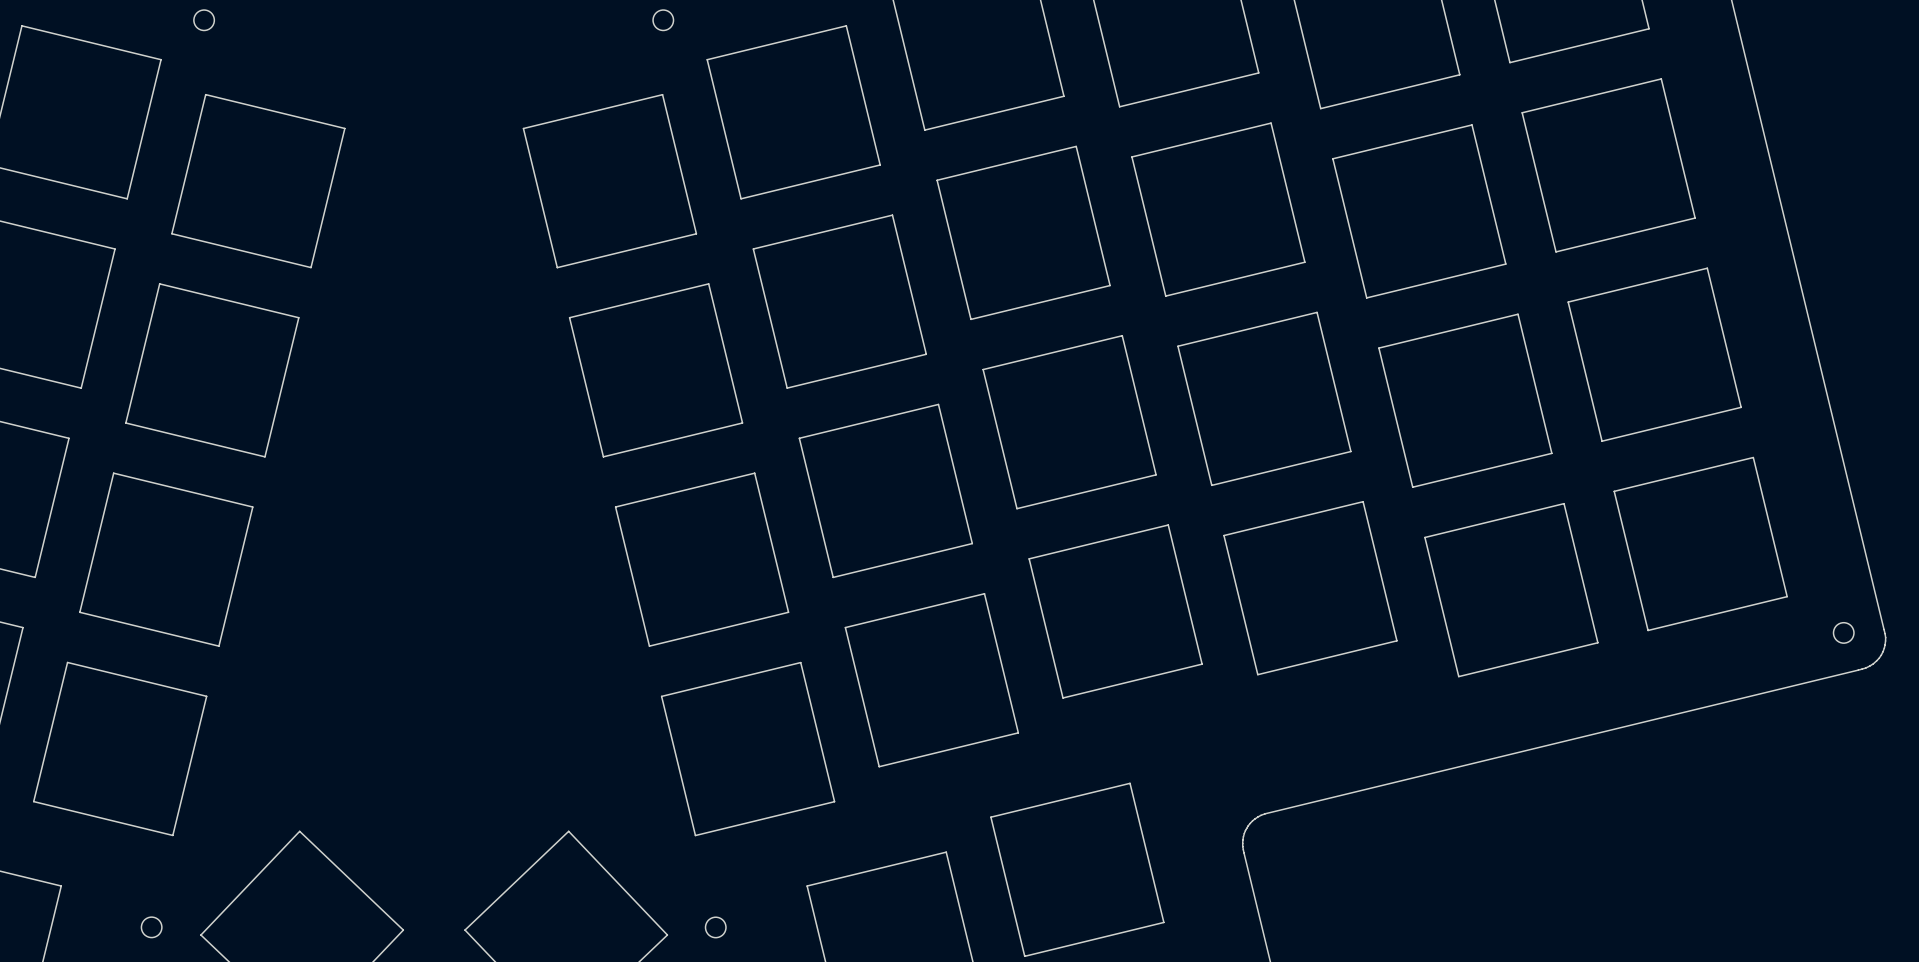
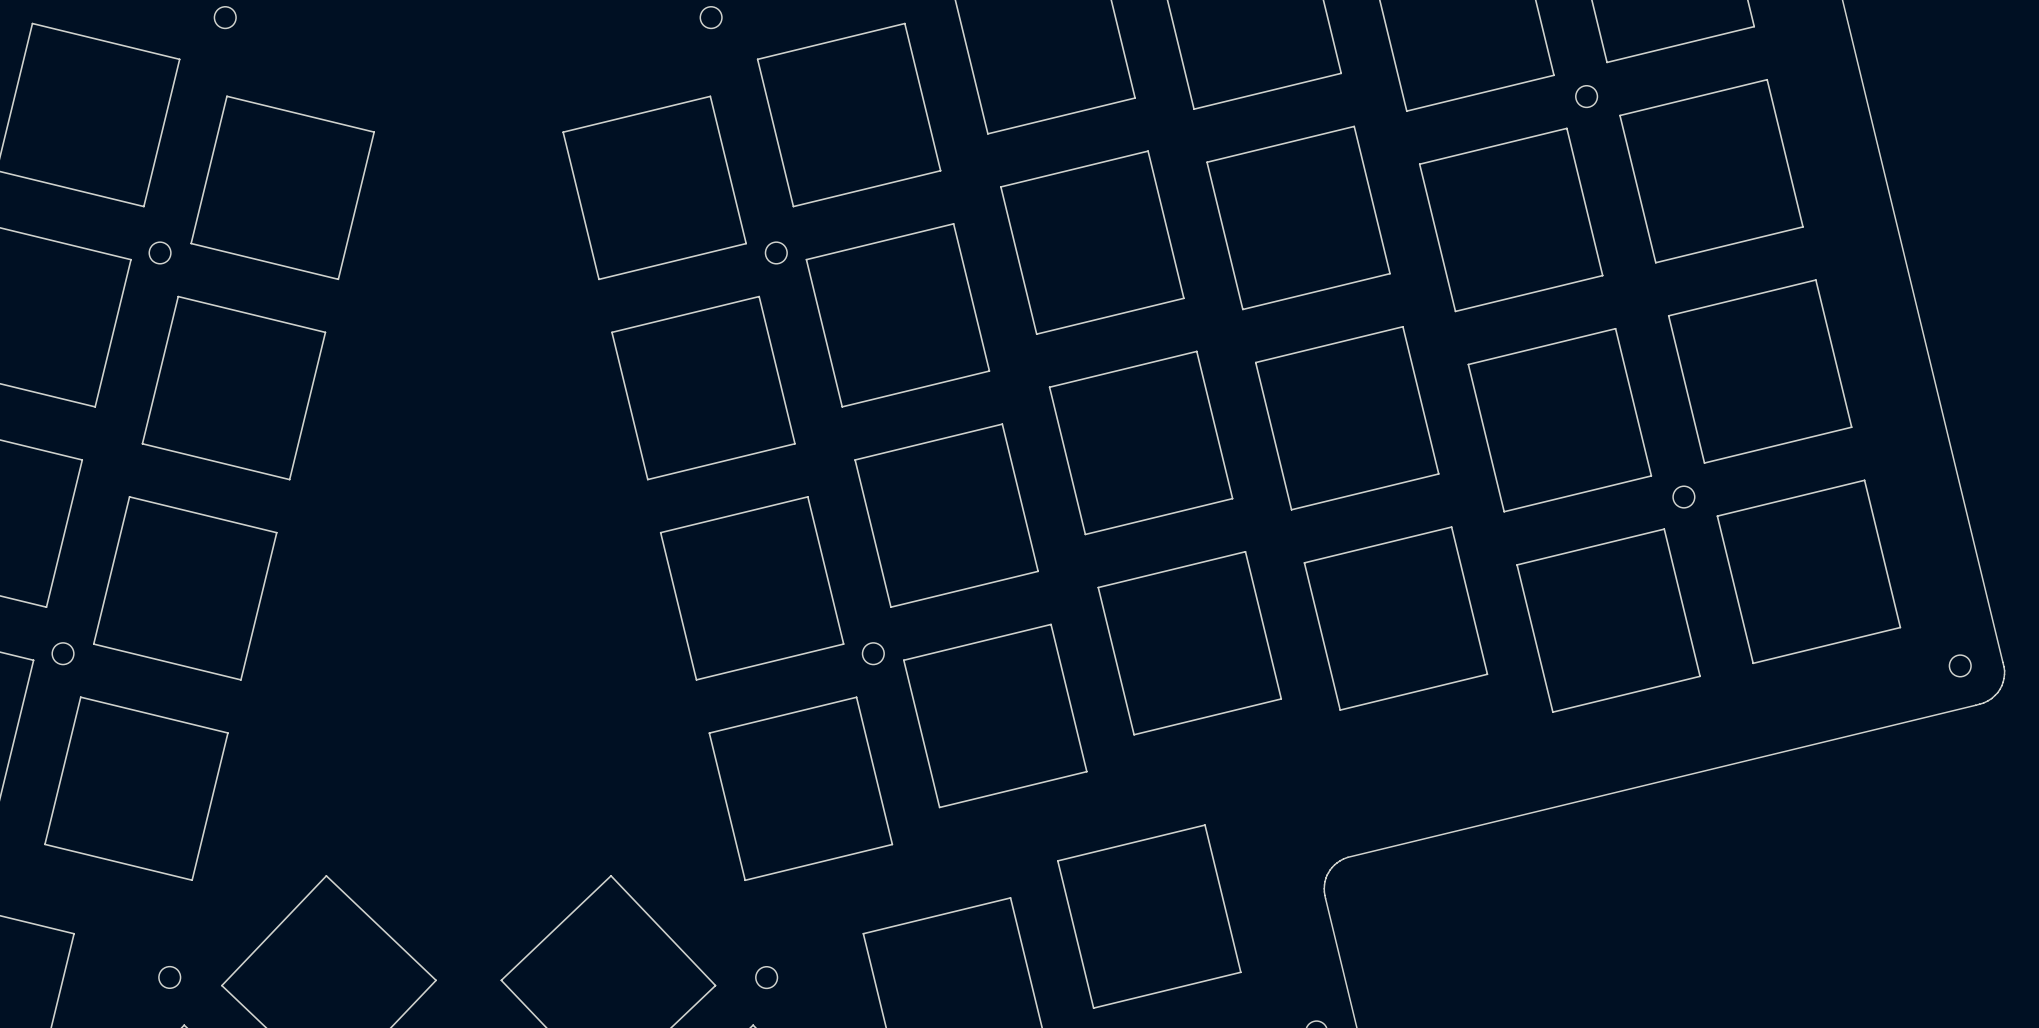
round board edge: none -> [1575, 85, 1598, 108]
round board edge: none -> [148, 241, 172, 265]
round board edge: none -> [764, 241, 788, 265]
round board edge: none -> [1672, 485, 1696, 509]
round board edge: none -> [51, 642, 75, 666]
round board edge: none -> [861, 642, 885, 666]

